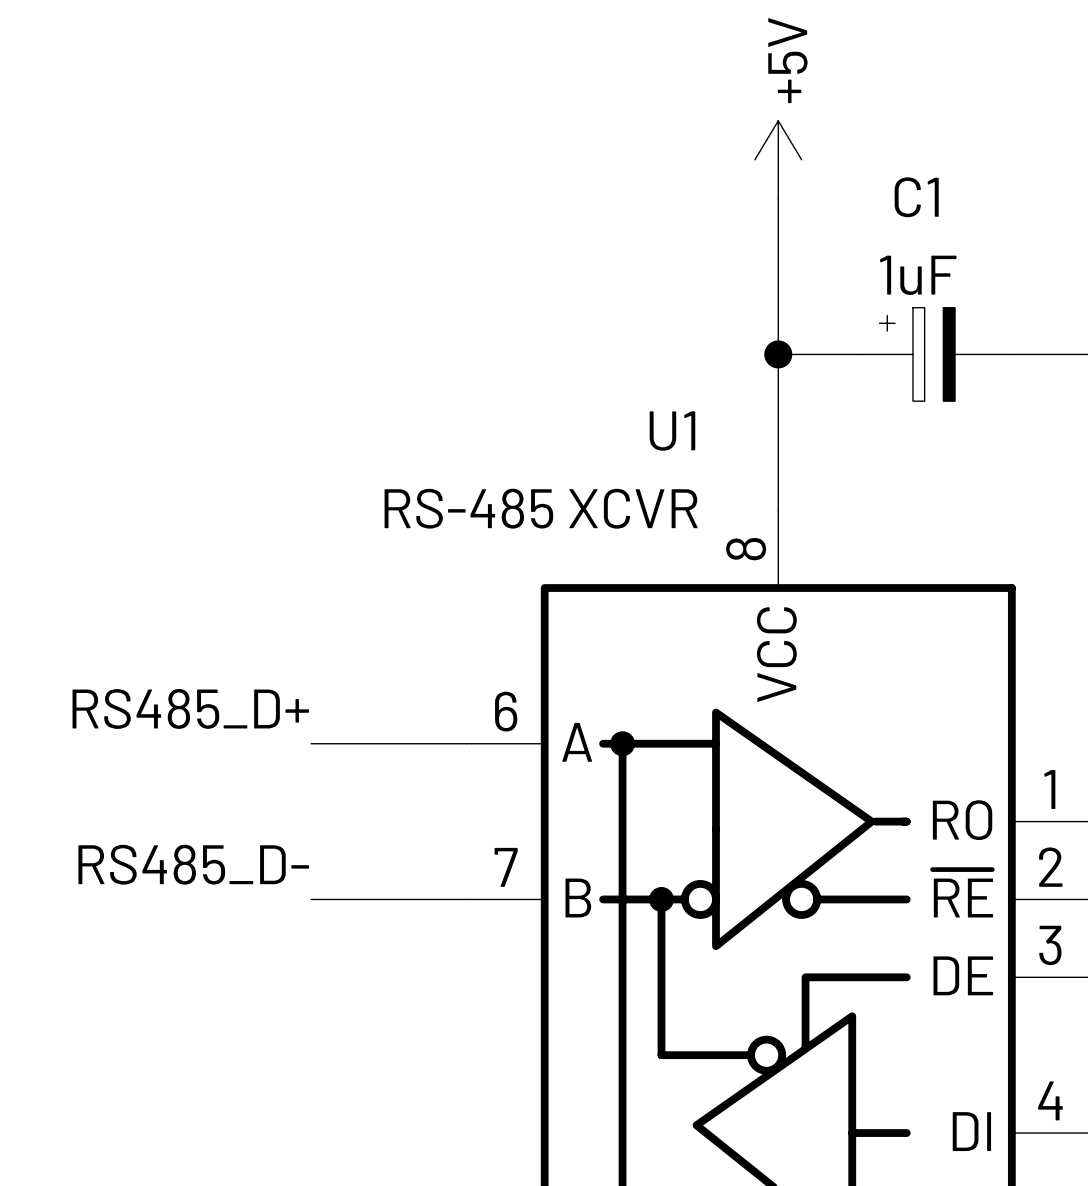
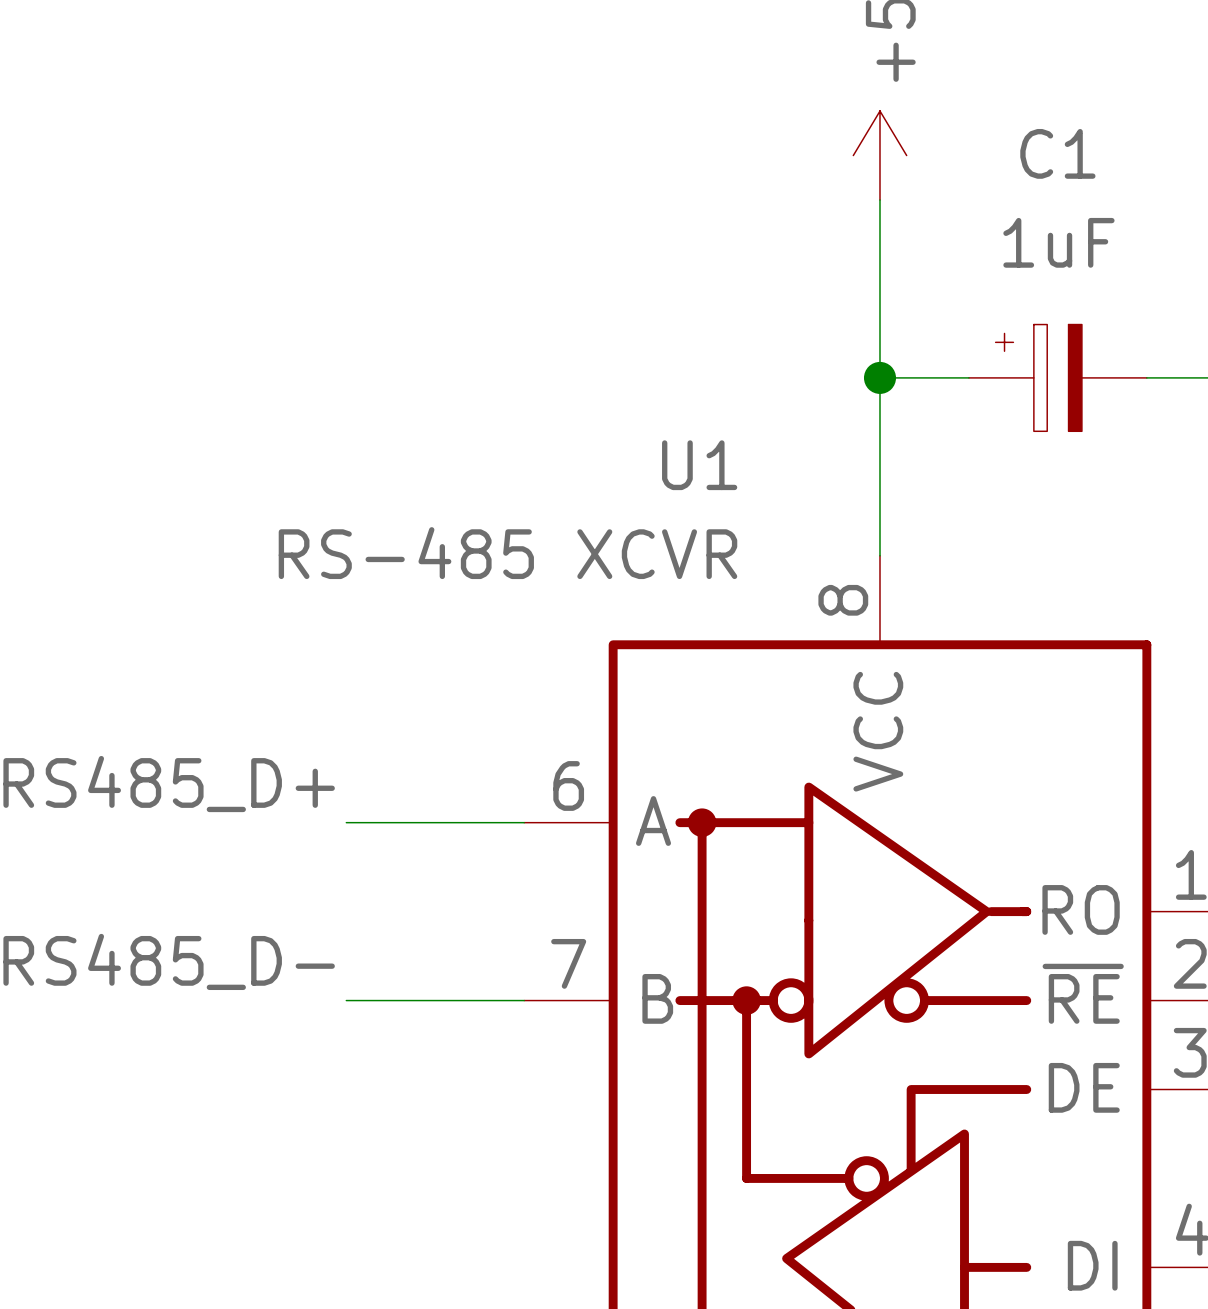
C1 name position: C1 (916, 197) -> C1 (1057, 153)
C1 value position: 1uF (918, 275) -> 1uF (1058, 242)
U1 name position: U1 (672, 431) -> U1 (699, 465)
U1 value position: RS-485 XCVR (541, 508) -> RS-485 XCVR (507, 553)

